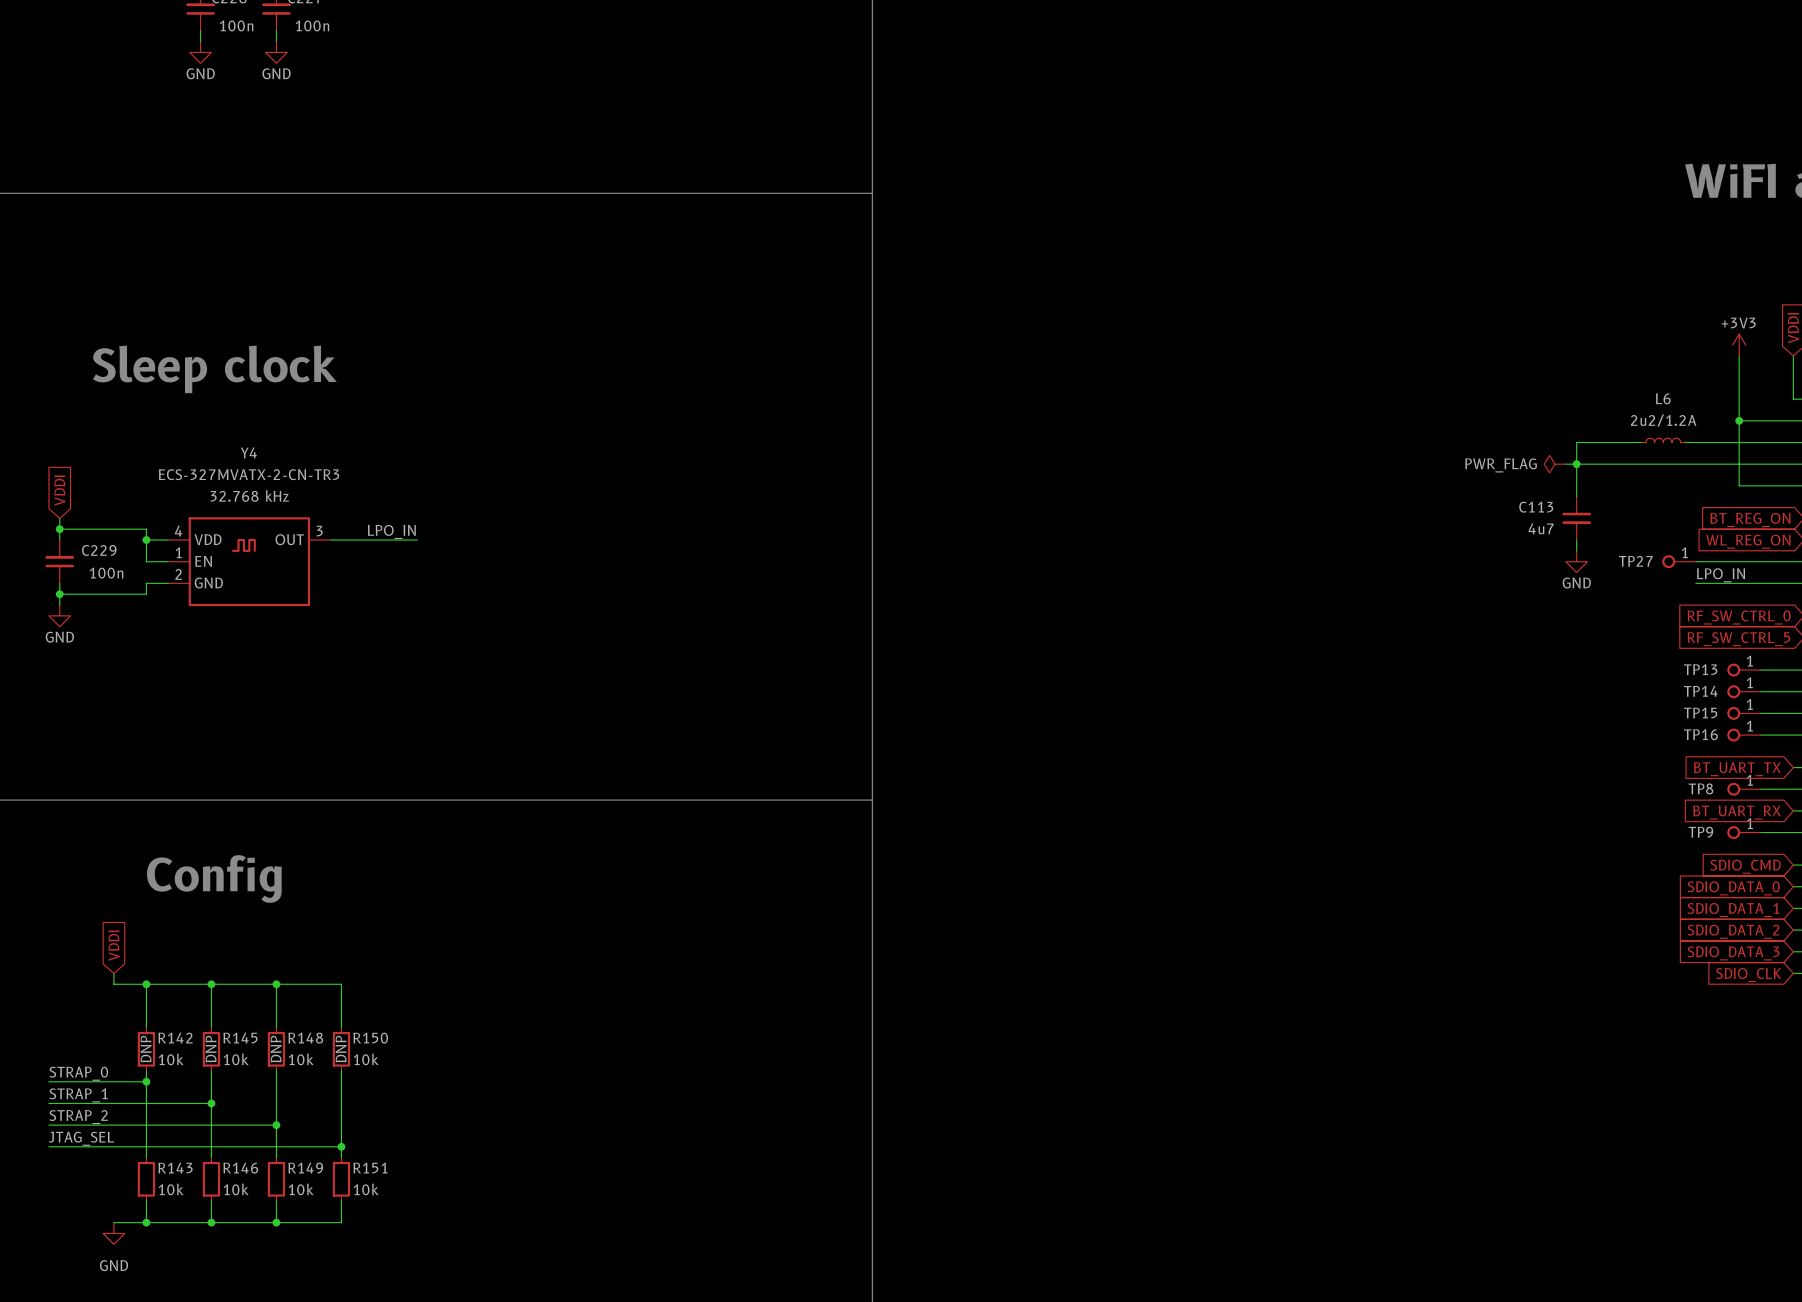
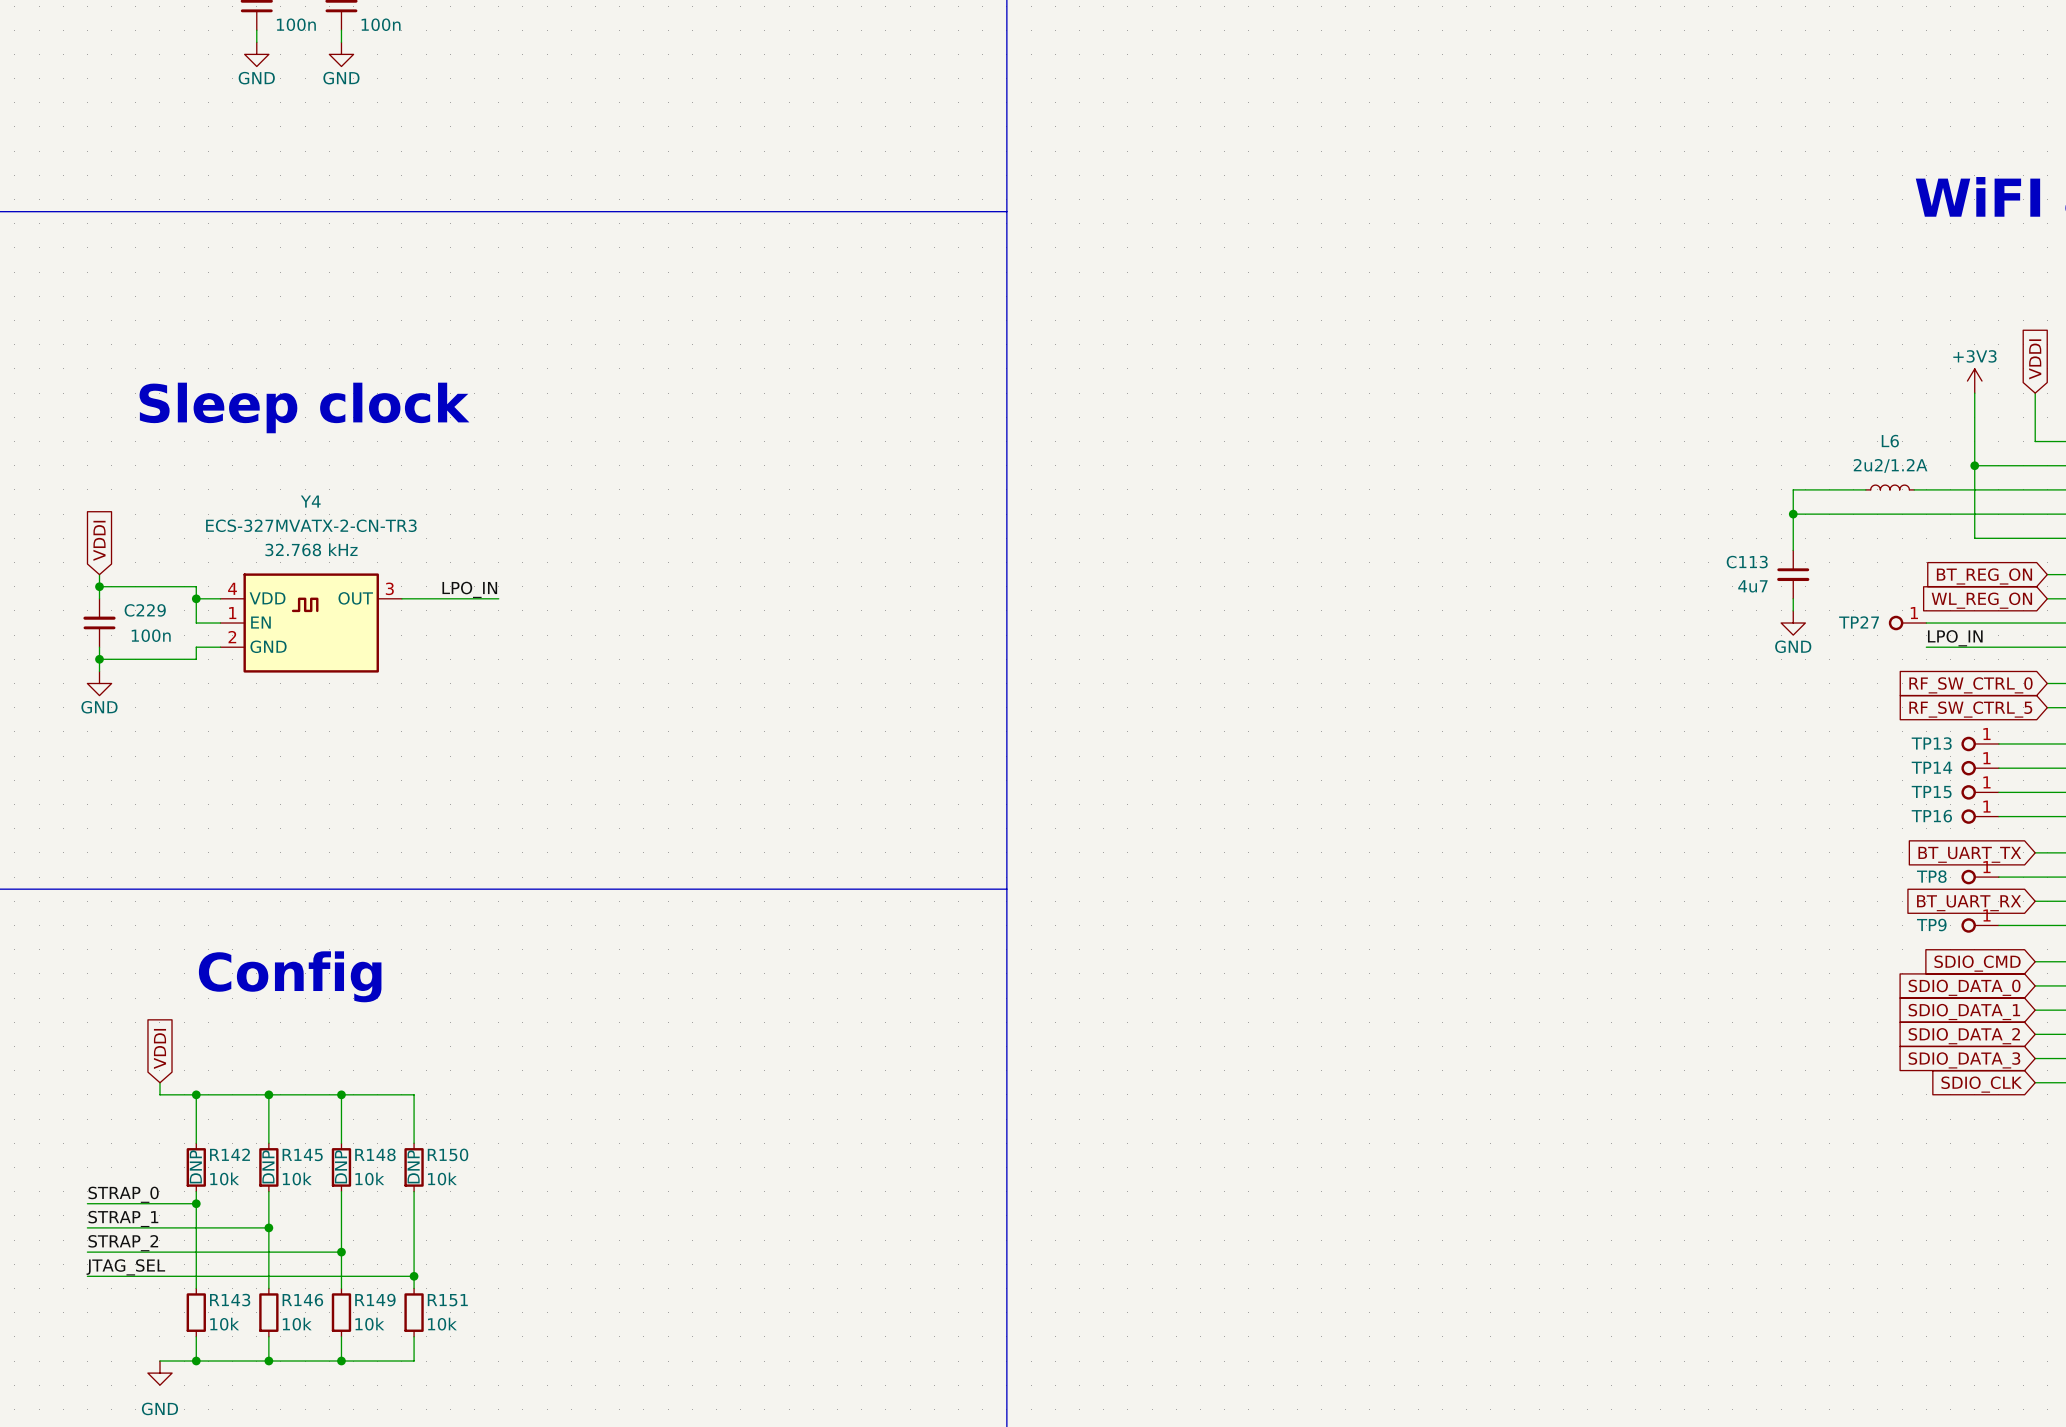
power symbol: PWR_FLAG (1554, 464) -> none
wire: (1565, 464) (1576, 464) -> none

